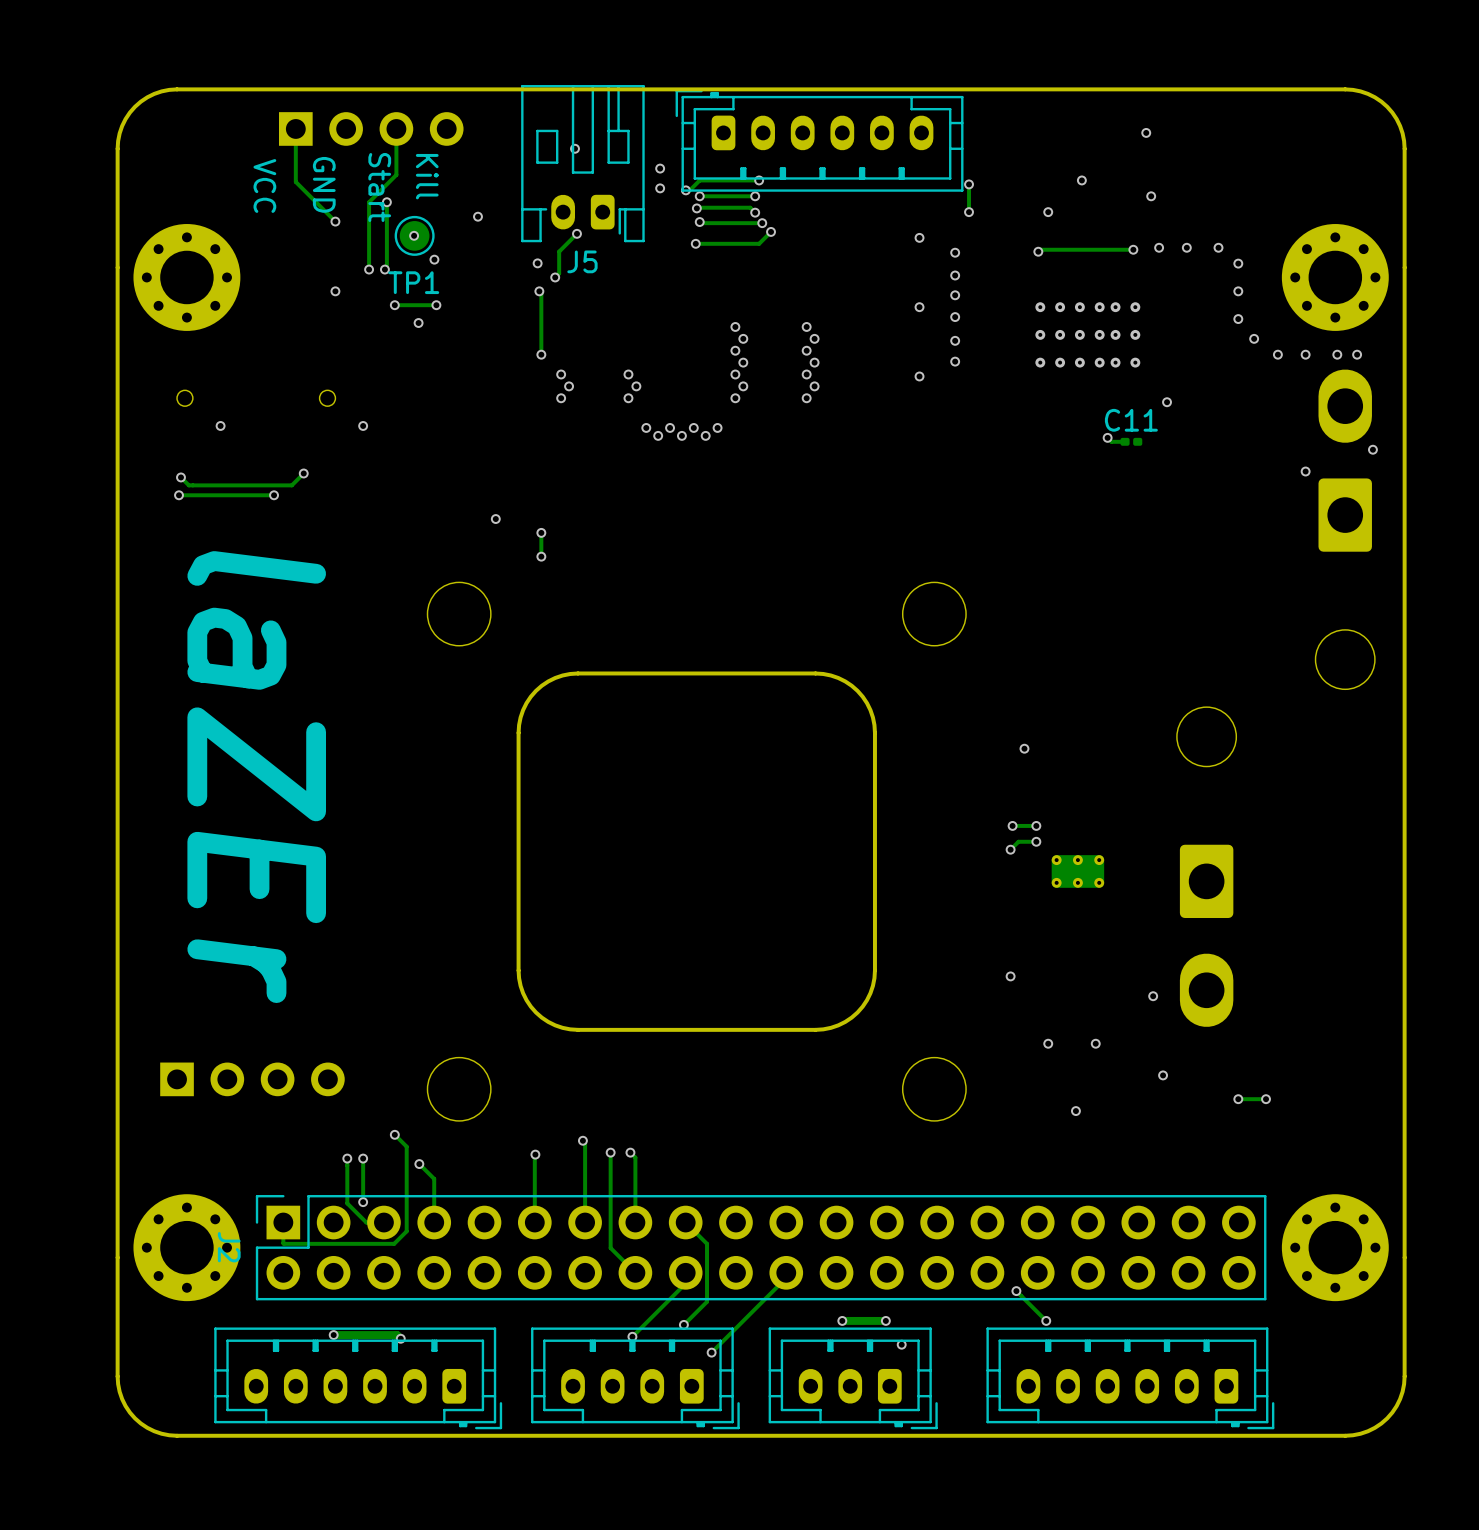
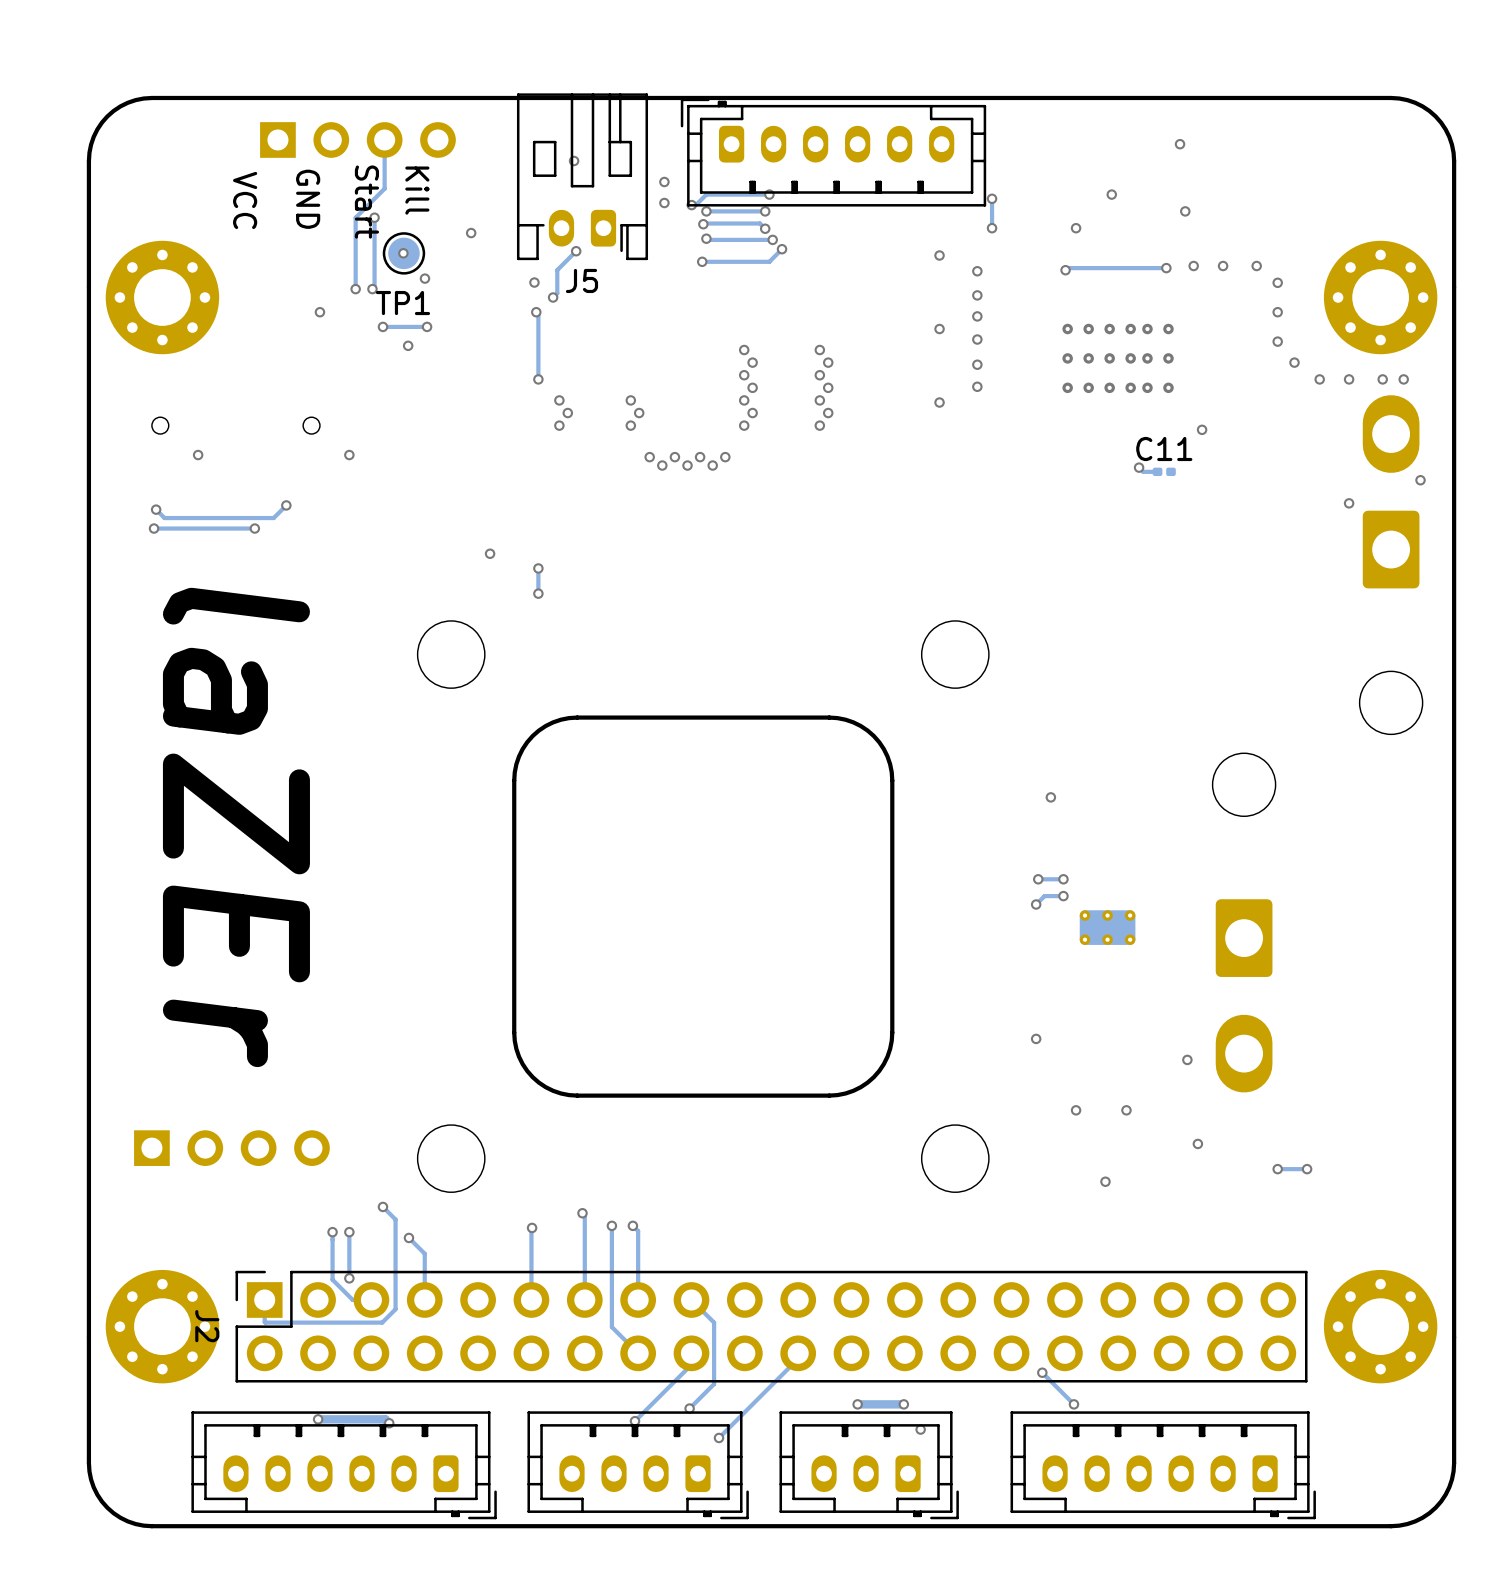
track: (295, 128) (295, 181) (335, 221) -> none
via: (335, 221) -> none

